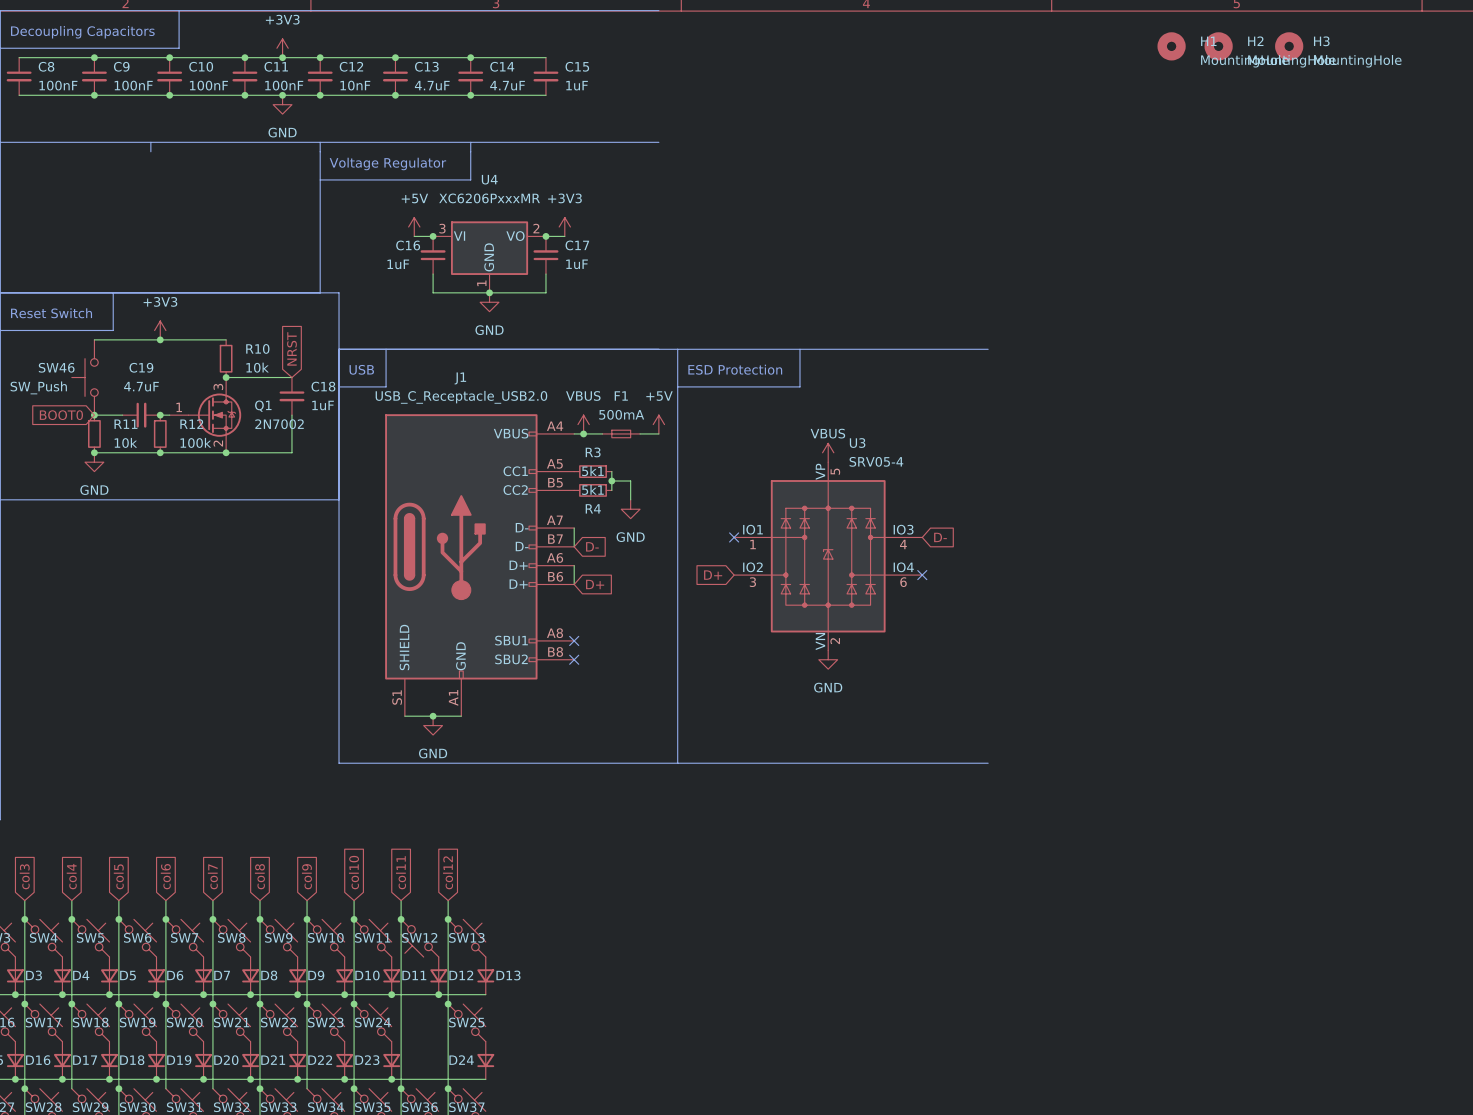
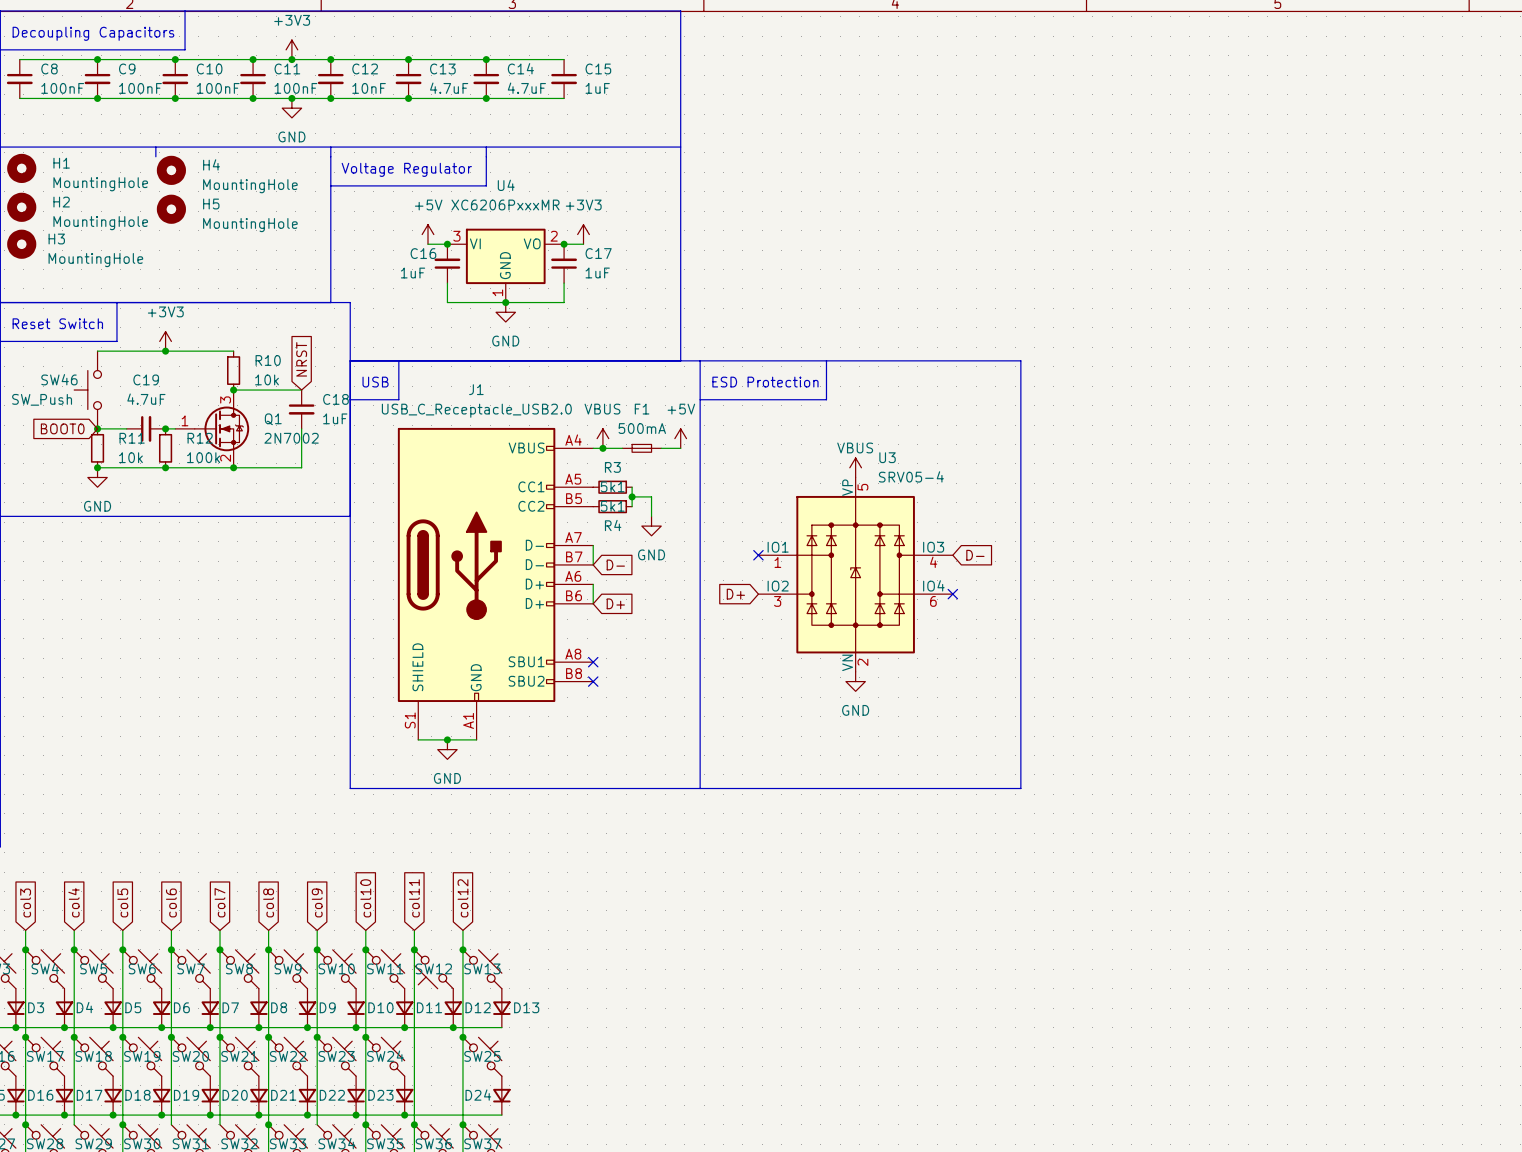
line: none -> (680, 10) (680, 360)
H1 position: (1171, 46) -> (21, 168)
H2 position: (1218, 46) -> (21, 207)
H3 position: (1289, 46) -> (21, 244)
H4: none -> MountingHole (171, 170)
H5: none -> MountingHole (171, 209)
line: none -> (1020, 360) (1020, 788)

